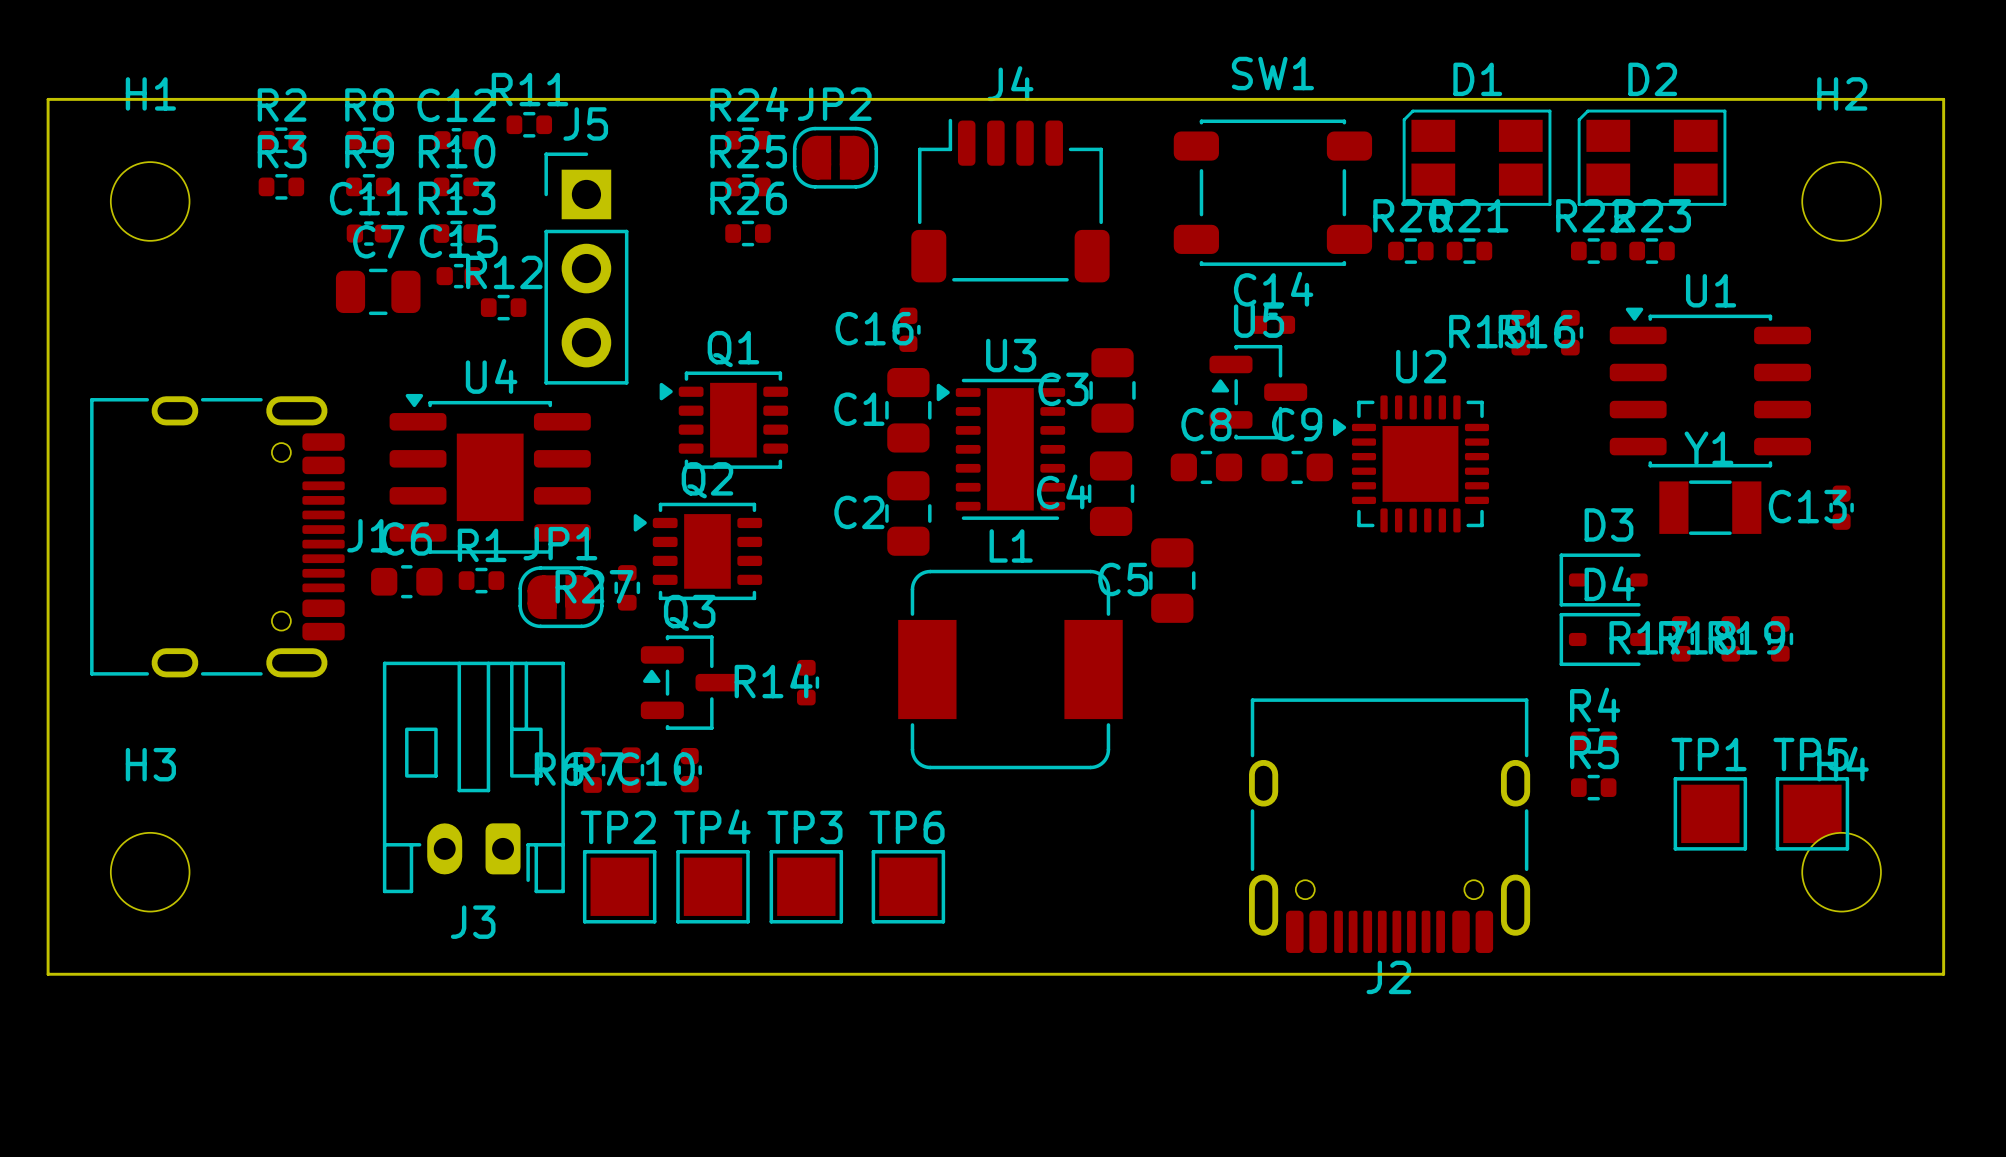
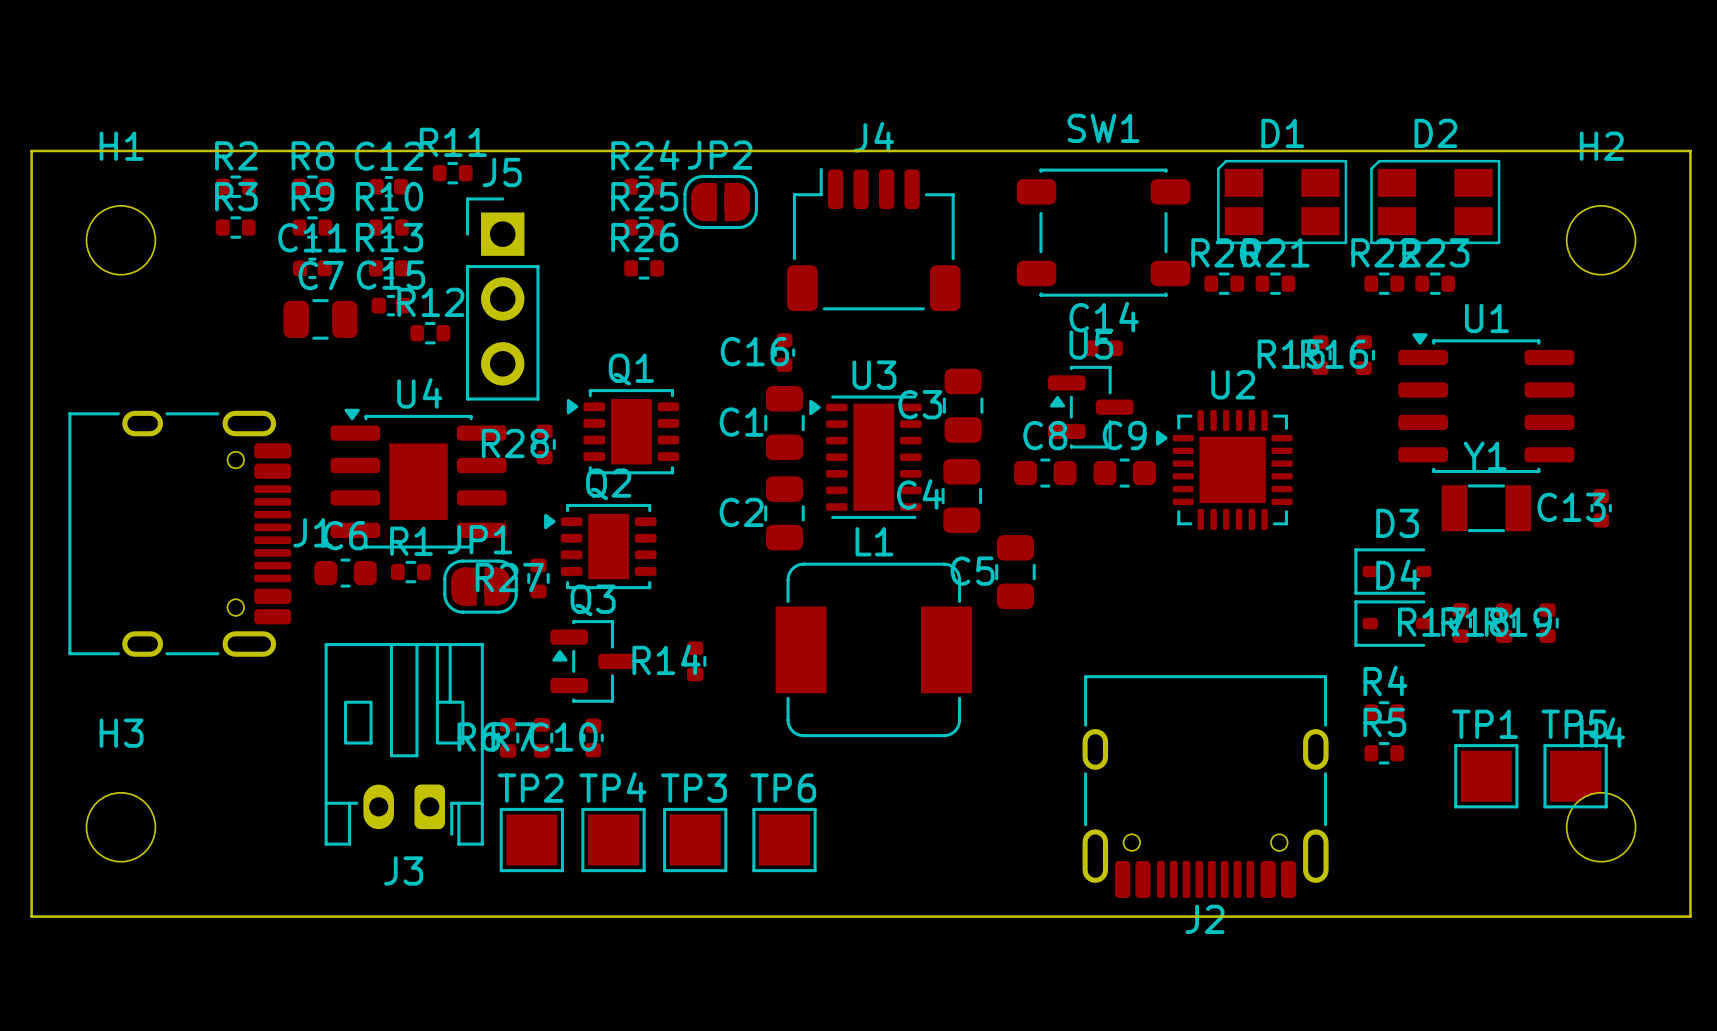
R28: none -> (544, 444)

